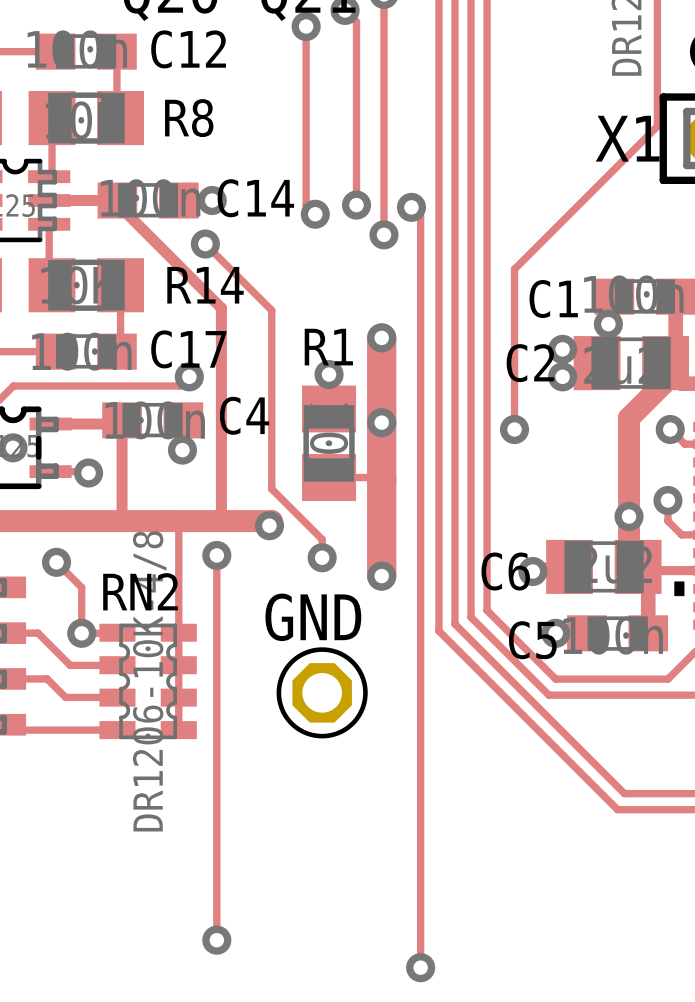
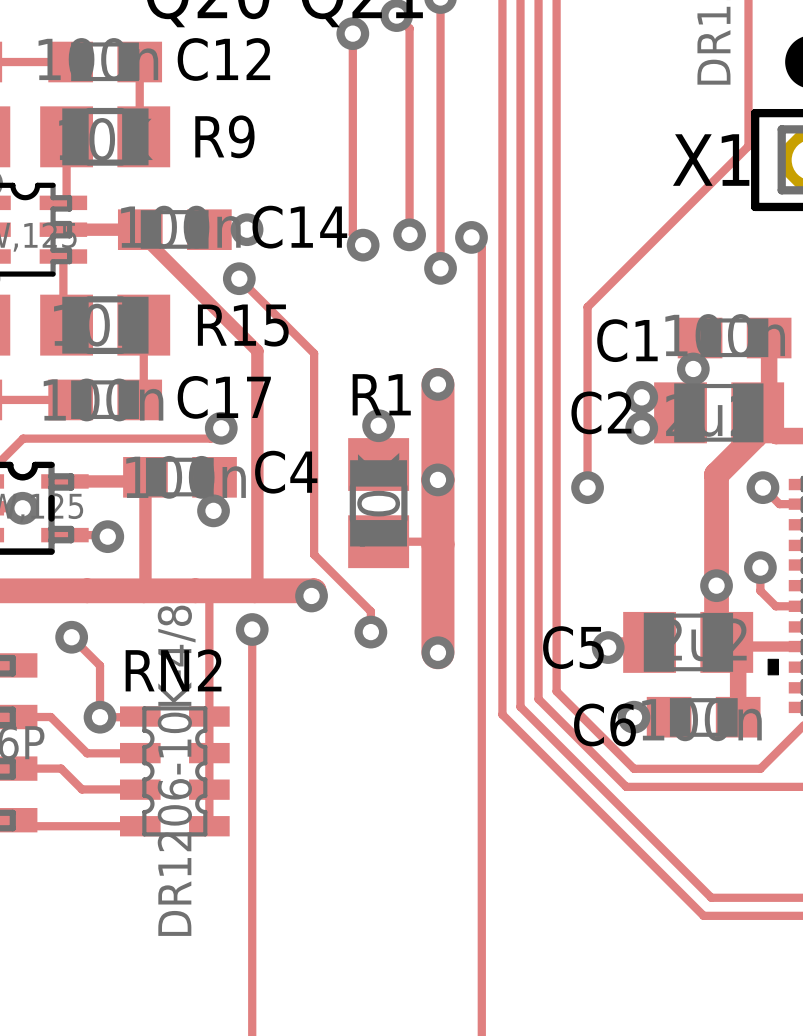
R8 name: R8 (189, 118) -> R9 (224, 136)
R14 name: R14 (205, 285) -> R15 (243, 325)
C6 name: C6 (505, 571) -> C5 (573, 647)
C5 name: C5 (532, 640) -> C6 (604, 724)
GND: (322, 692) -> none

